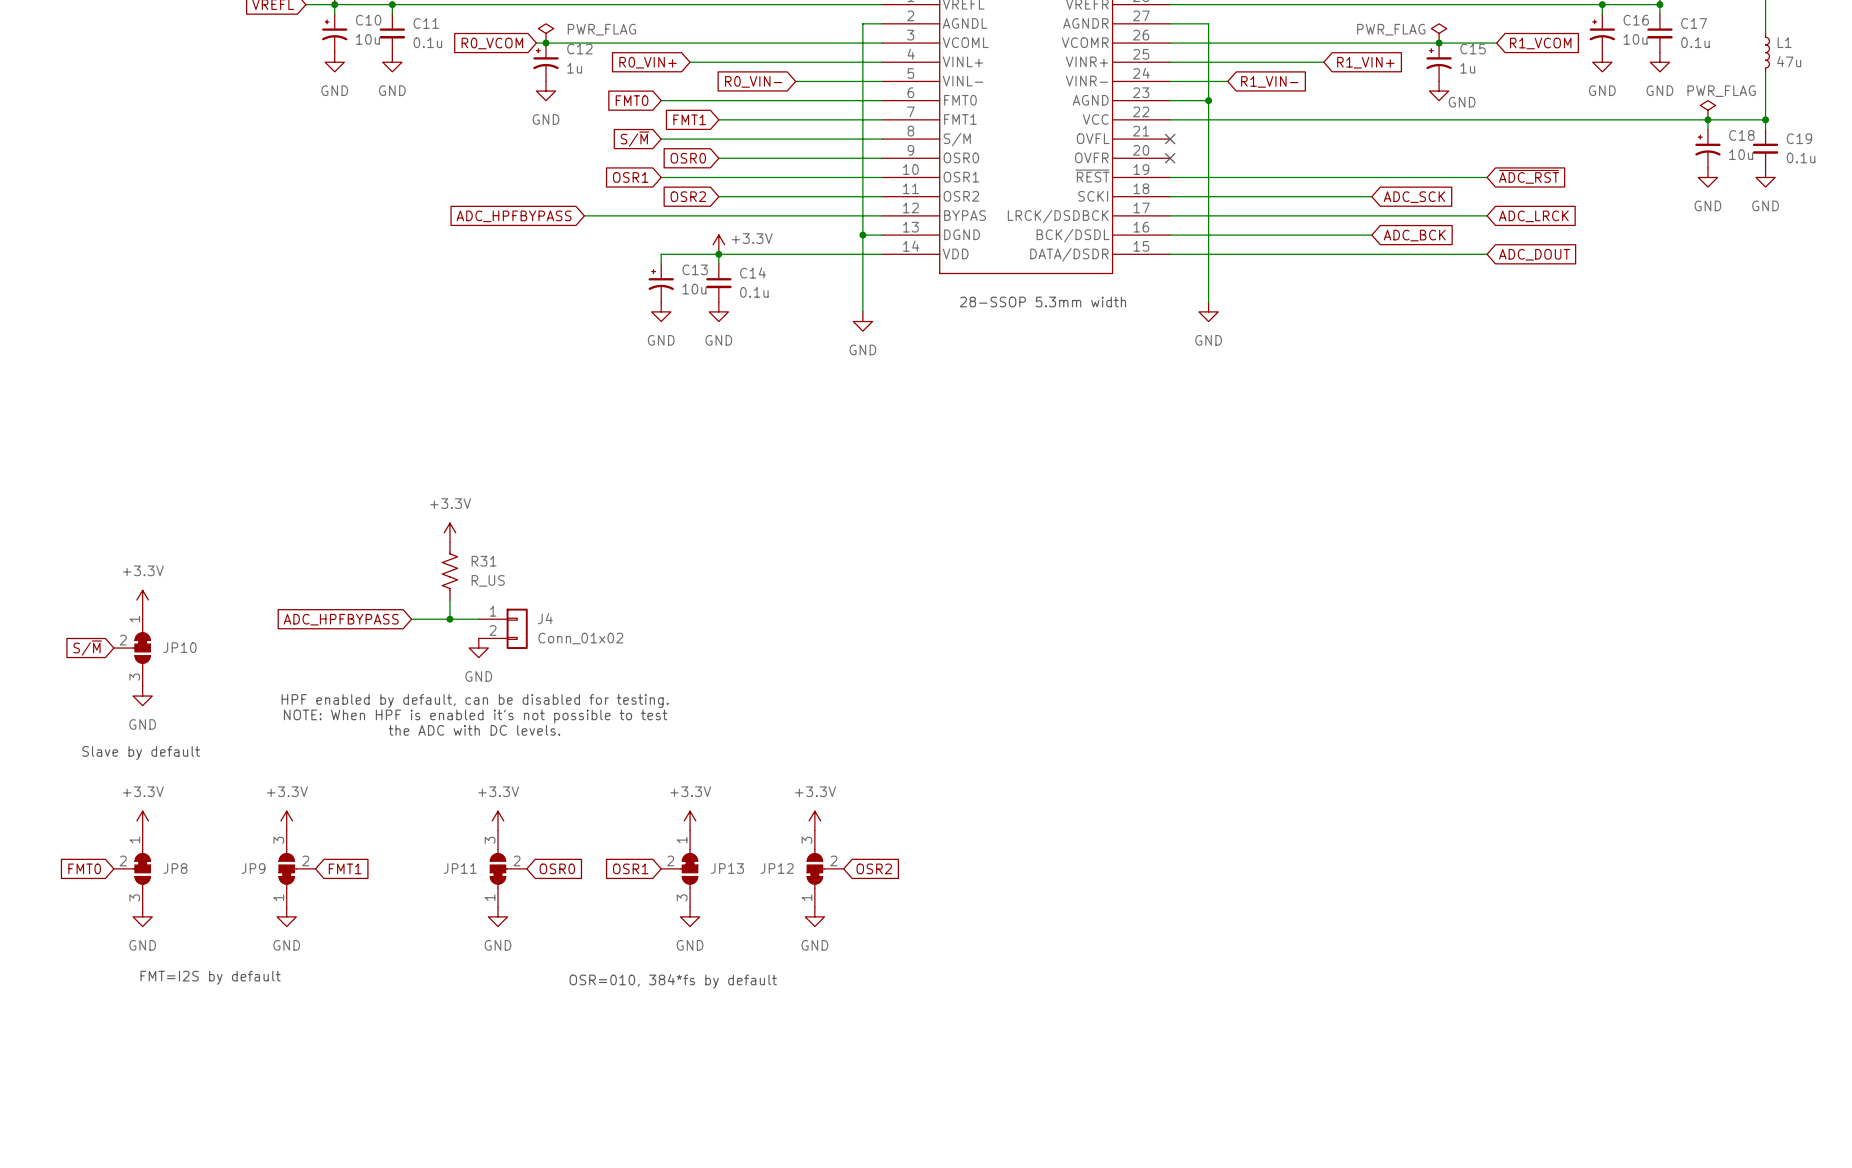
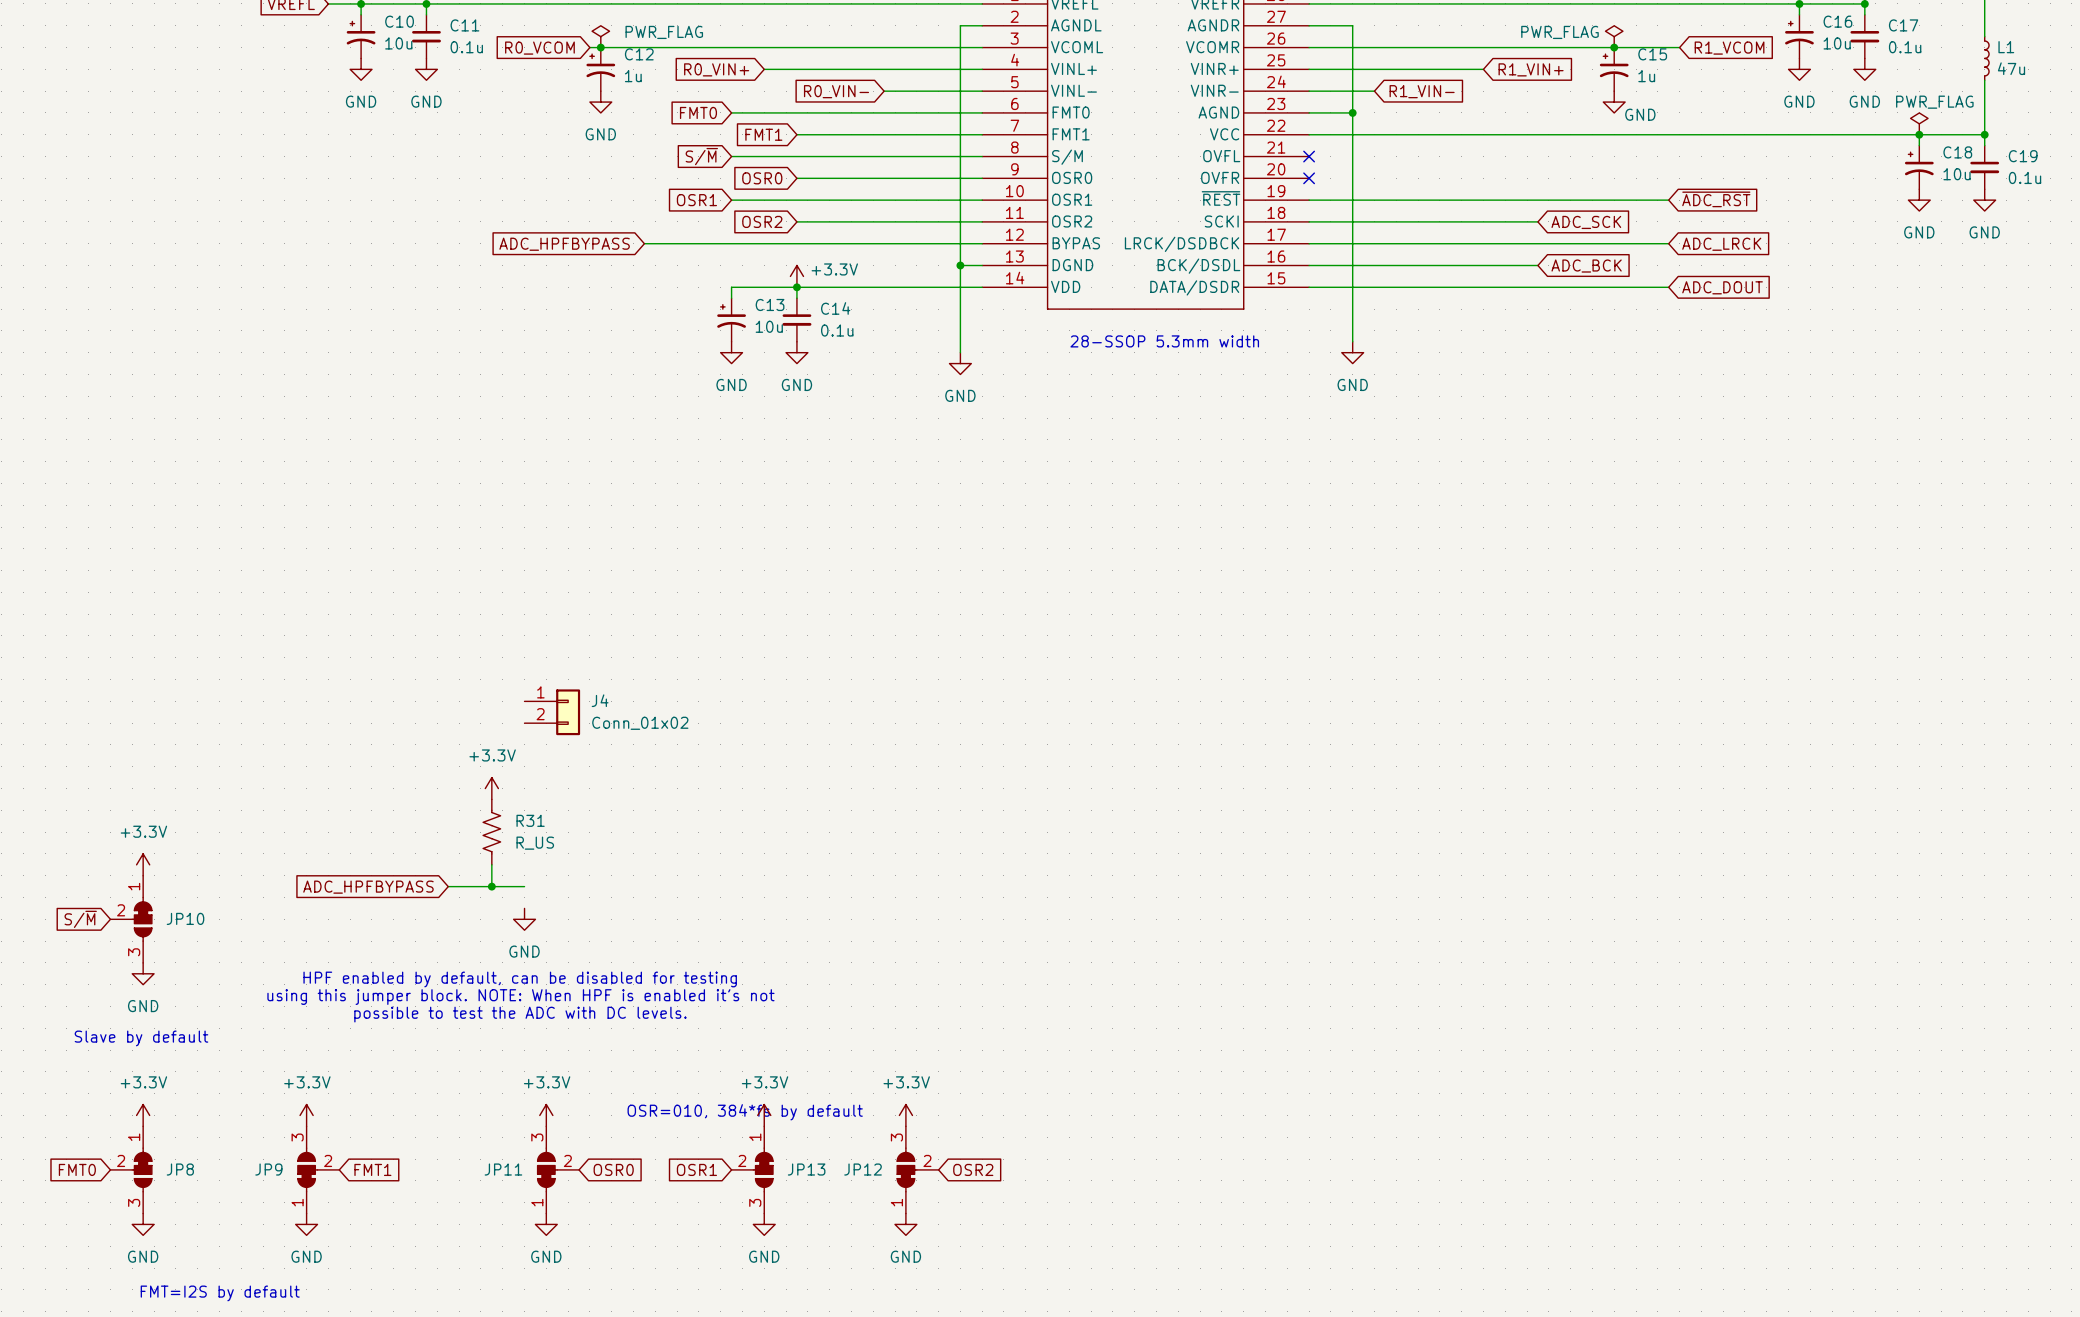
power symbol: +3.3V (449, 532) -> none
R31 position: (449, 571) -> (491, 832)
power symbol: +3.3V (142, 600) -> none
wire: (449, 600) (449, 619) -> (491, 864) (491, 886)
global label position: ADC_HPFBYPASS (341, 619) -> ADC_HPFBYPASS (368, 887)
wire: (411, 619) (478, 619) -> (448, 886) (524, 886)
junction: (449, 619) -> none
global label position: S/~{M} (87, 648) -> S/~{M} (80, 919)
JP10 position: (132, 648) -> (131, 919)
power symbol: GND (478, 648) -> none
power symbol: GND (142, 696) -> none
power symbol: none -> +3.3V (491, 788)
text: HPF enabled by default, can be disabled for testing. (475, 701) -> none
text: NOTE: When HPF is enabled it's not possible to test (475, 716) -> none
text: the ADC with DC levels. (474, 730) -> none
text position: Slave by default (141, 753) -> Slave by default (141, 1038)
junction: none -> (491, 886)
power symbol: none -> GND (524, 919)
power symbol position: +3.3V (142, 820) -> +3.3V (143, 864)
power symbol: +3.3V (286, 820) -> none
power symbol: +3.3V (497, 820) -> none
power symbol: +3.3V (690, 820) -> none
power symbol: +3.3V (814, 820) -> none
text: none -> HPF enabled by default, can be disabled for testing (520, 979)
global label position: FMT0 (84, 868) -> FMT0 (77, 1169)
JP8 position: (132, 868) -> (131, 1169)
JP9 position: (297, 868) -> (318, 1169)
global label position: FMT1 (345, 868) -> FMT1 (372, 1169)
JP11 position: (508, 868) -> (558, 1169)
global label position: OSR0 (557, 868) -> OSR0 (613, 1169)
global label position: OSR1 (630, 868) -> OSR1 (696, 1169)
JP13 position: (679, 868) -> (752, 1169)
JP12 position: (825, 868) -> (917, 1169)
global label position: OSR2 (874, 868) -> OSR2 (973, 1169)
text: none -> using this jumper block. NOTE: When HPF is enabled it's not (520, 997)
text: none -> possible to test the ADC with DC levels. (520, 1014)
power symbol position: GND (142, 916) -> GND (143, 973)
power symbol: GND (286, 916) -> none
power symbol: GND (497, 916) -> none
power symbol: GND (690, 916) -> none
power symbol: GND (814, 916) -> none
text position: FMT=I2S by default (210, 977) -> FMT=I2S by default (220, 1293)
power symbol: none -> +3.3V (143, 1115)
power symbol: none -> +3.3V (306, 1115)
power symbol: none -> +3.3V (546, 1115)
power symbol: none -> +3.3V (764, 1115)
power symbol: none -> +3.3V (905, 1115)
power symbol: none -> GND (143, 1224)
power symbol: none -> GND (306, 1224)
power symbol: none -> GND (546, 1224)
power symbol: none -> GND (764, 1224)
power symbol: none -> GND (905, 1224)

